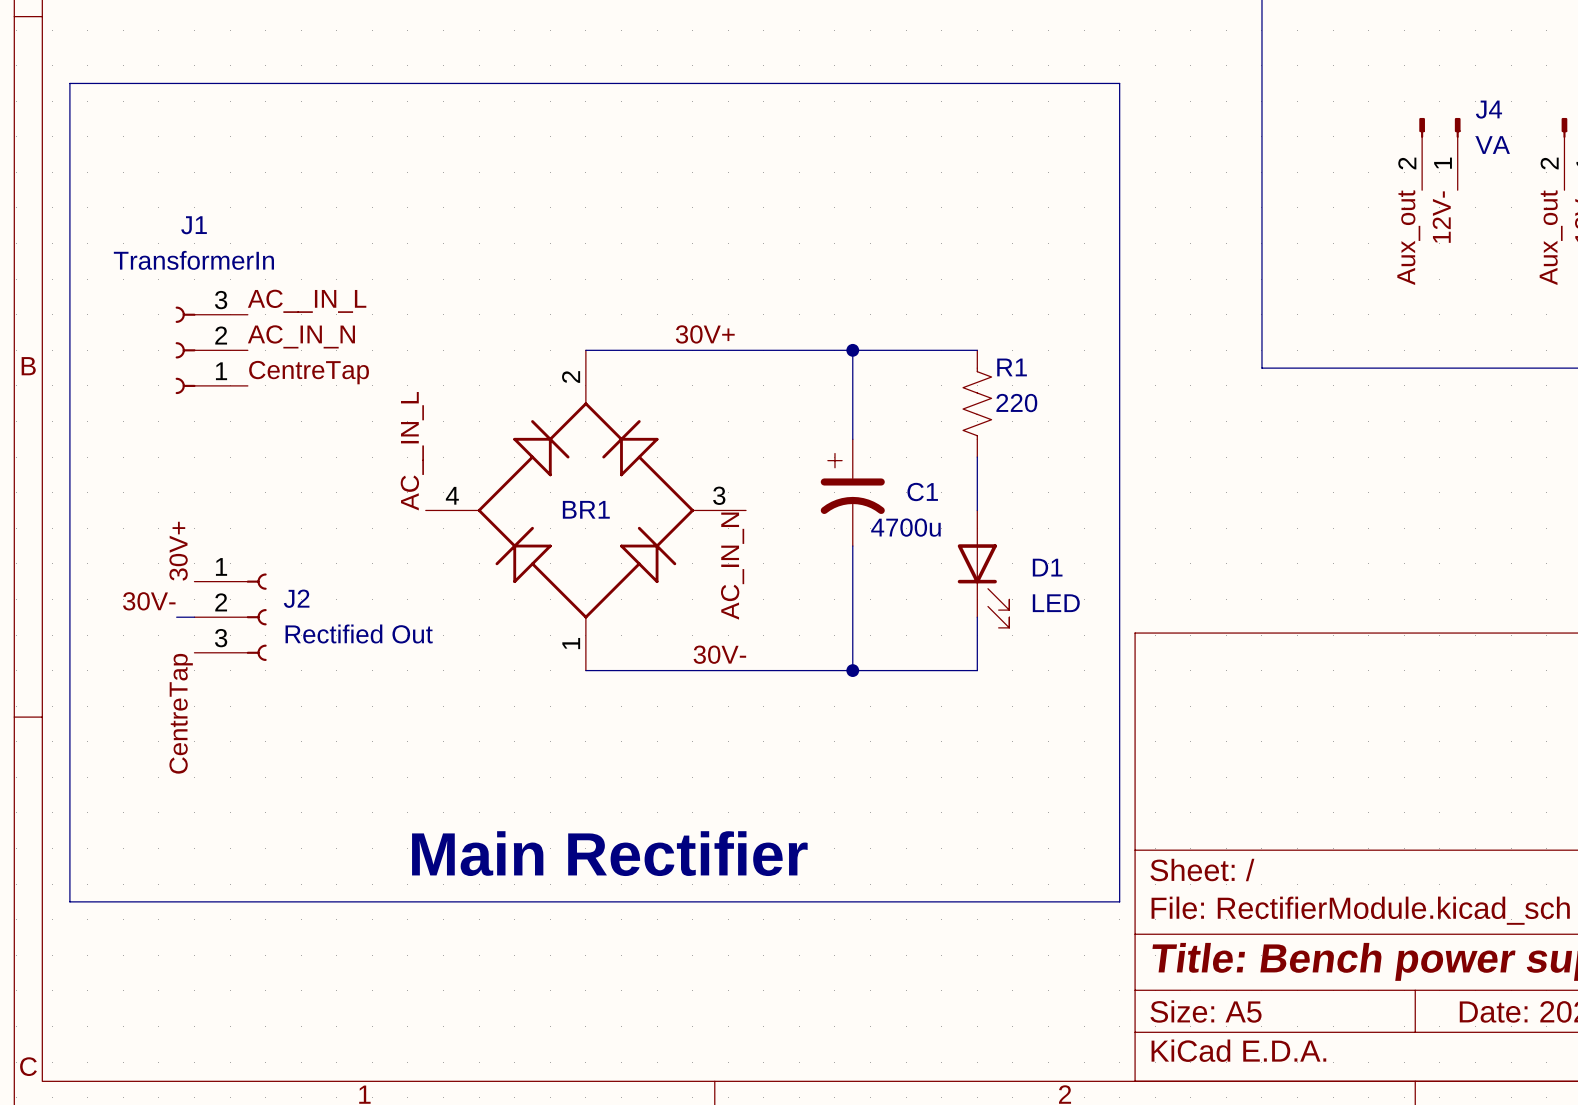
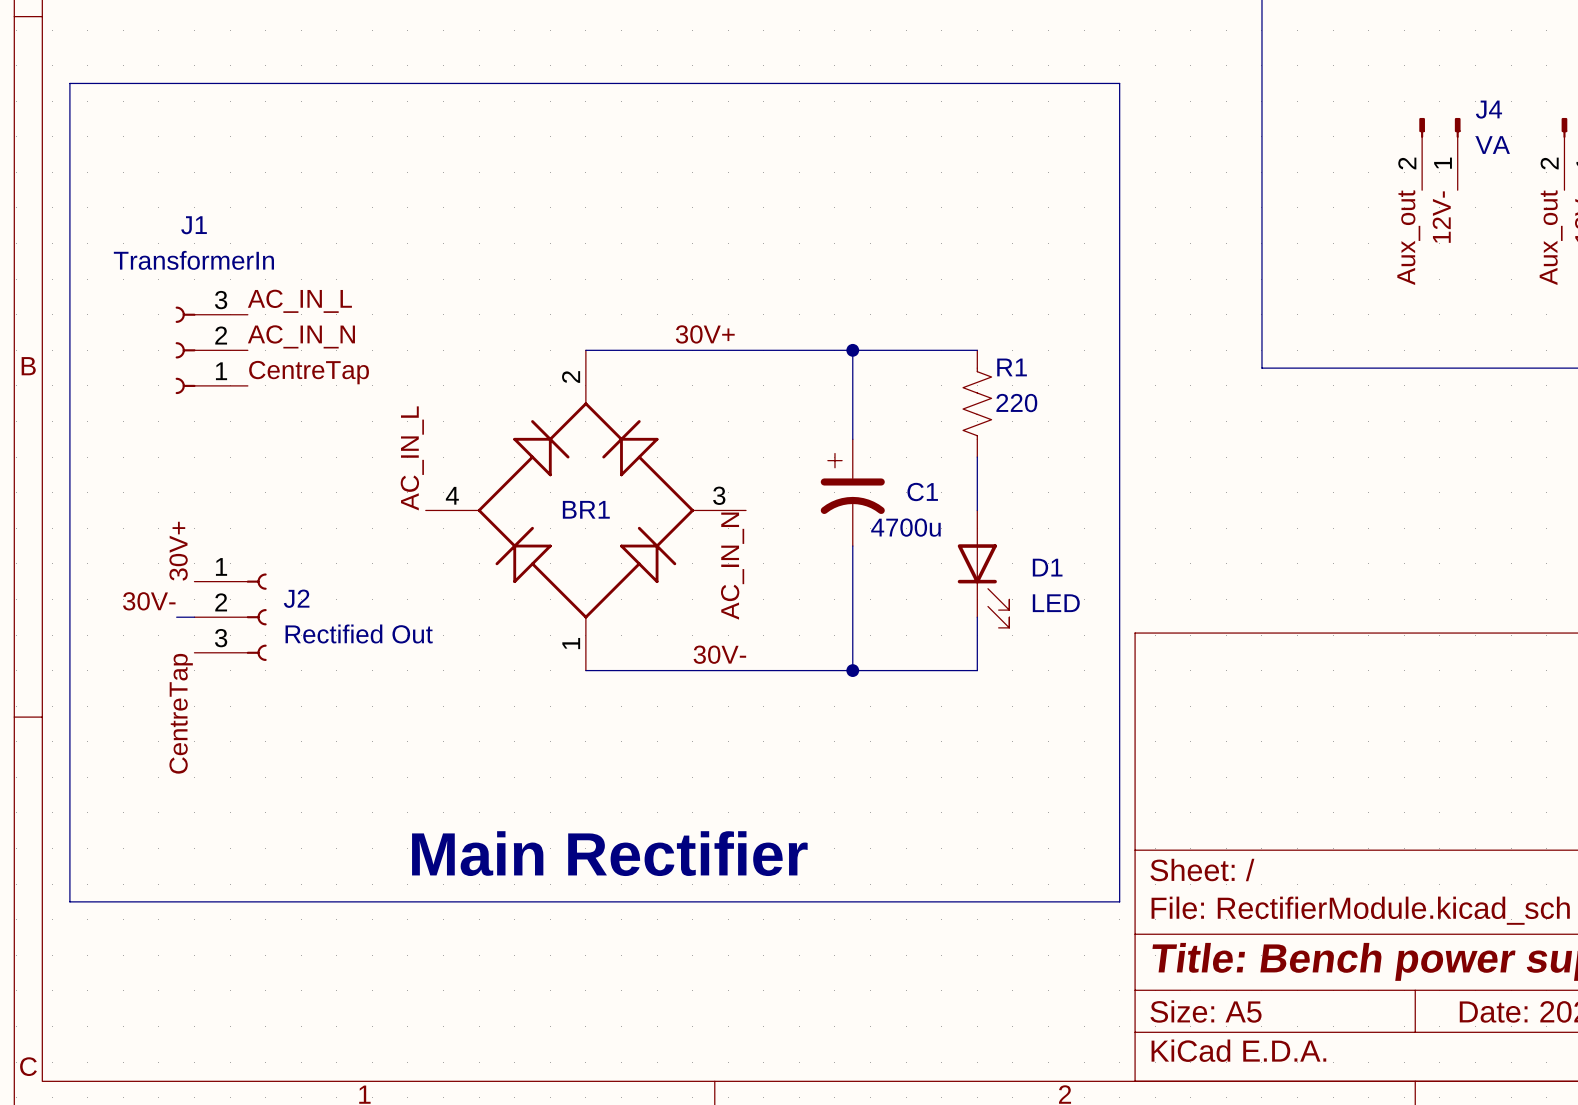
label: AC__IN_L (307, 301) -> AC_IN_L (299, 301)
label: AC__IN_L (412, 451) -> AC_IN_L (412, 458)

